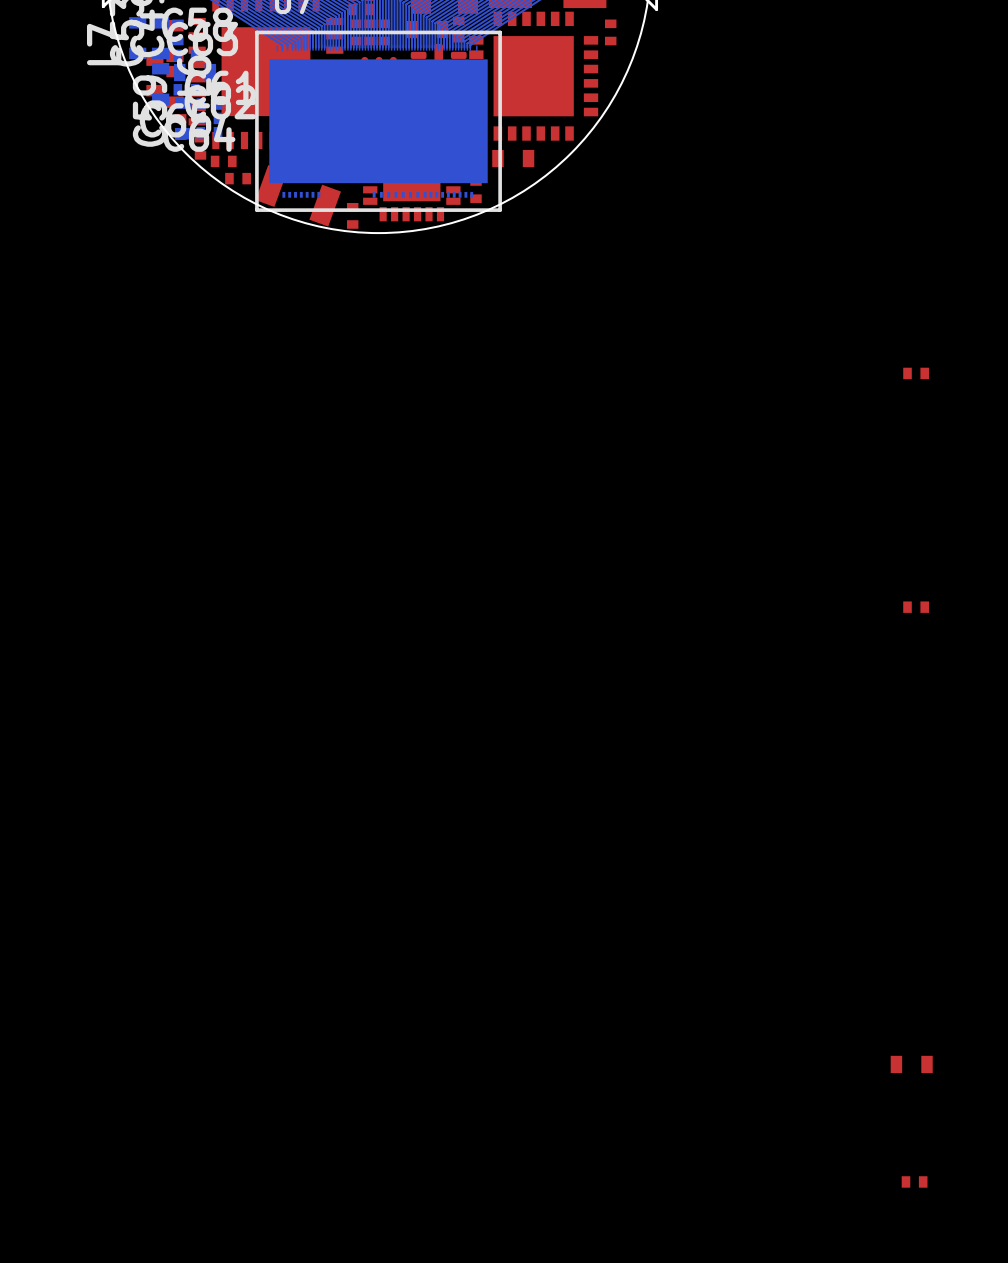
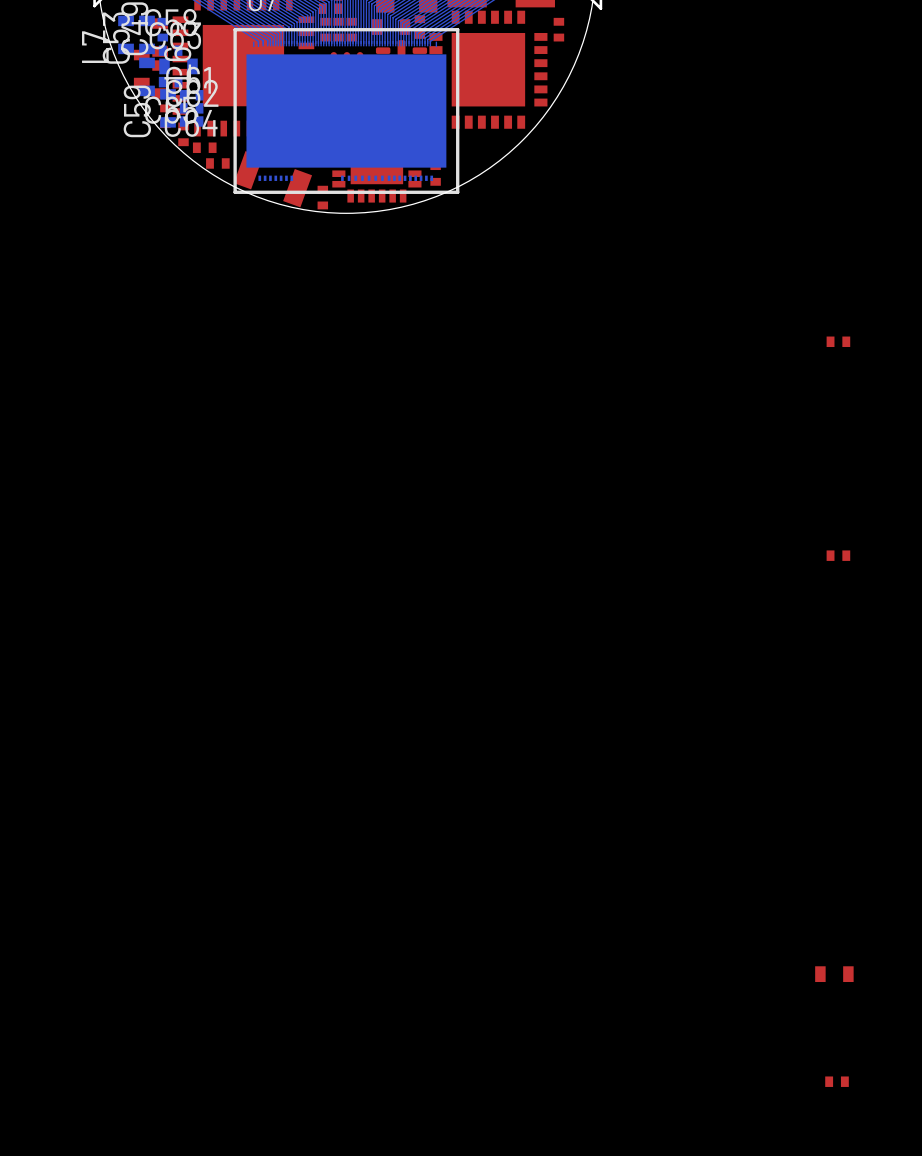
part: (513, 158) -> none

